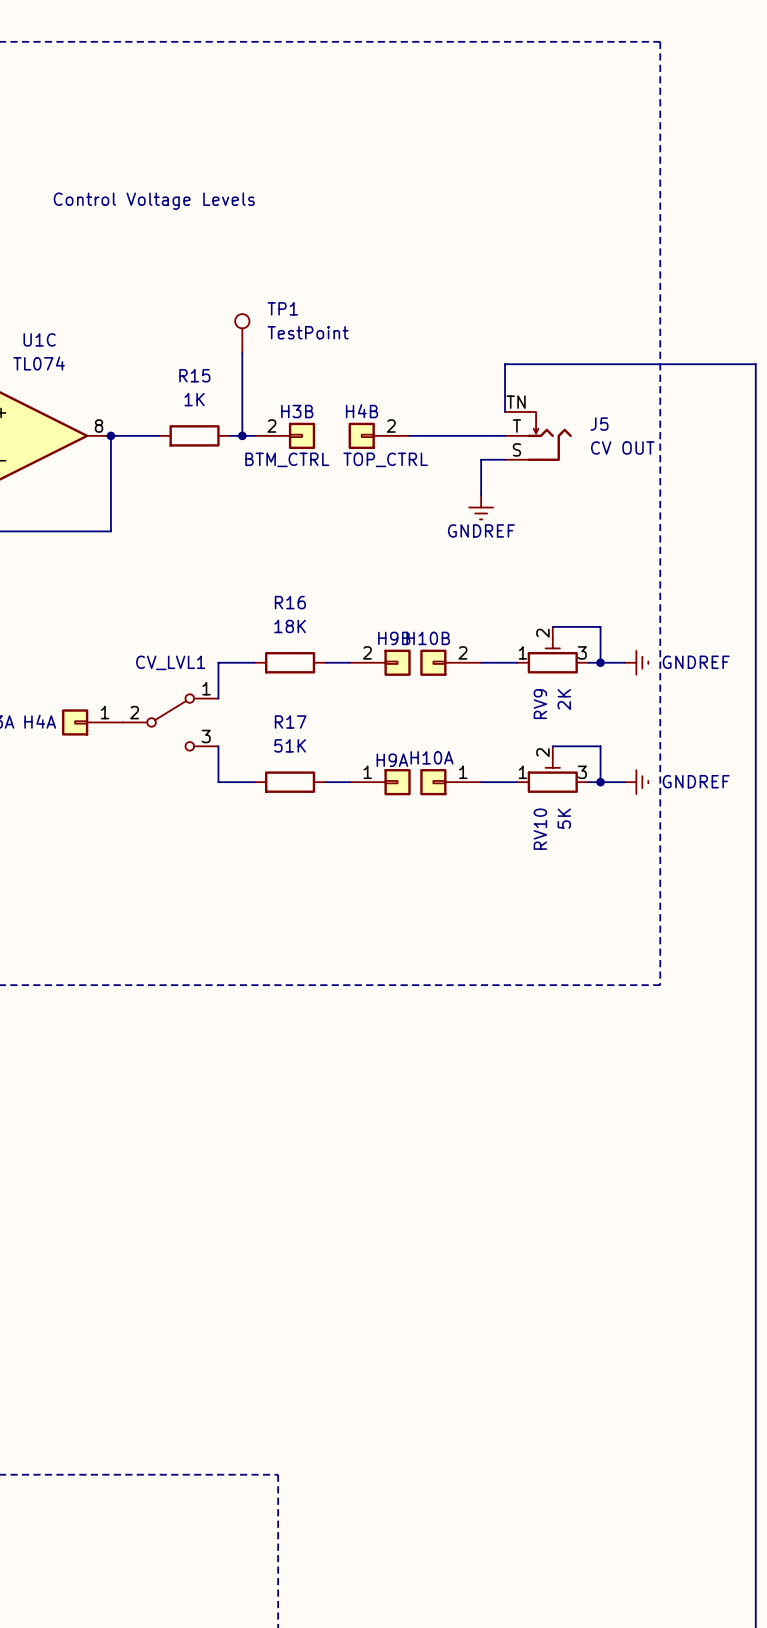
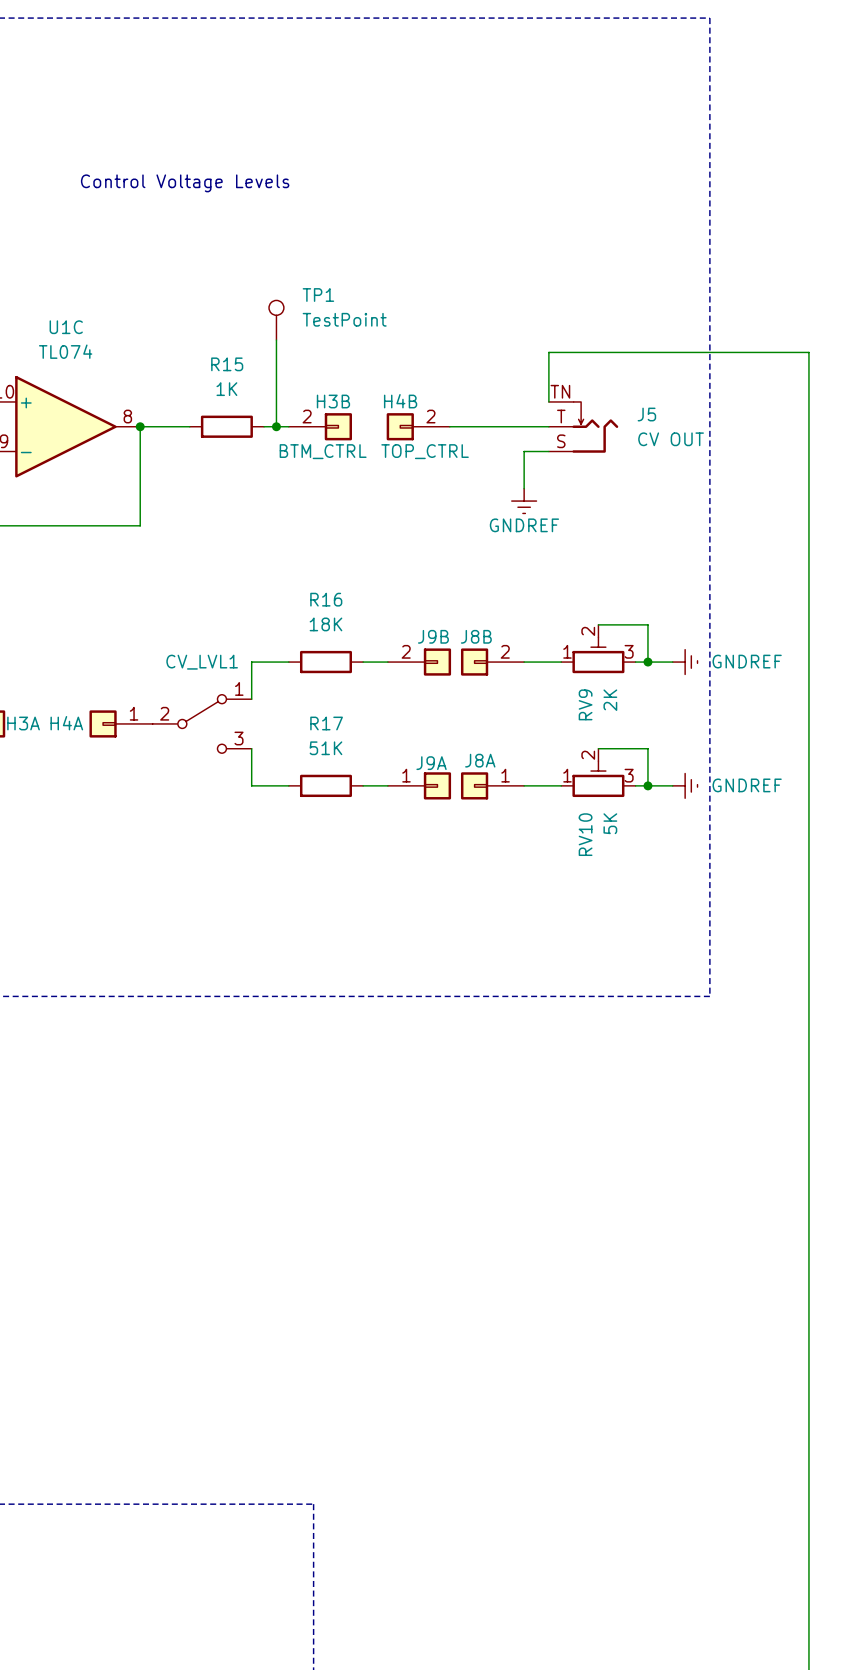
H9B name: H9B (394, 638) -> J9B (433, 636)
H10B name: H10B (428, 638) -> J8B (476, 636)
H10A name: H10A (432, 757) -> J8A (480, 760)
H9A name: H9A (392, 760) -> J9A (431, 763)

